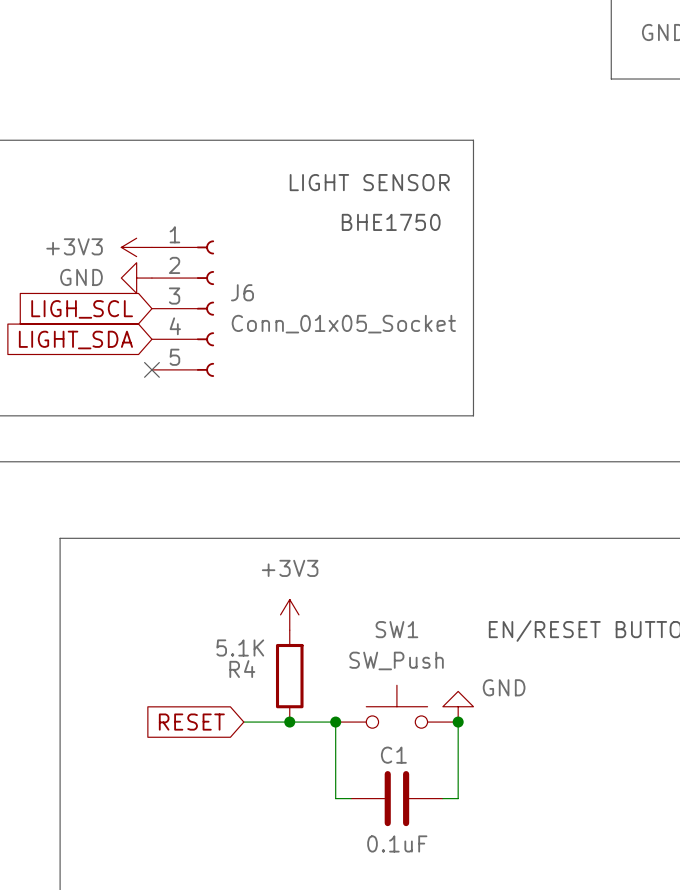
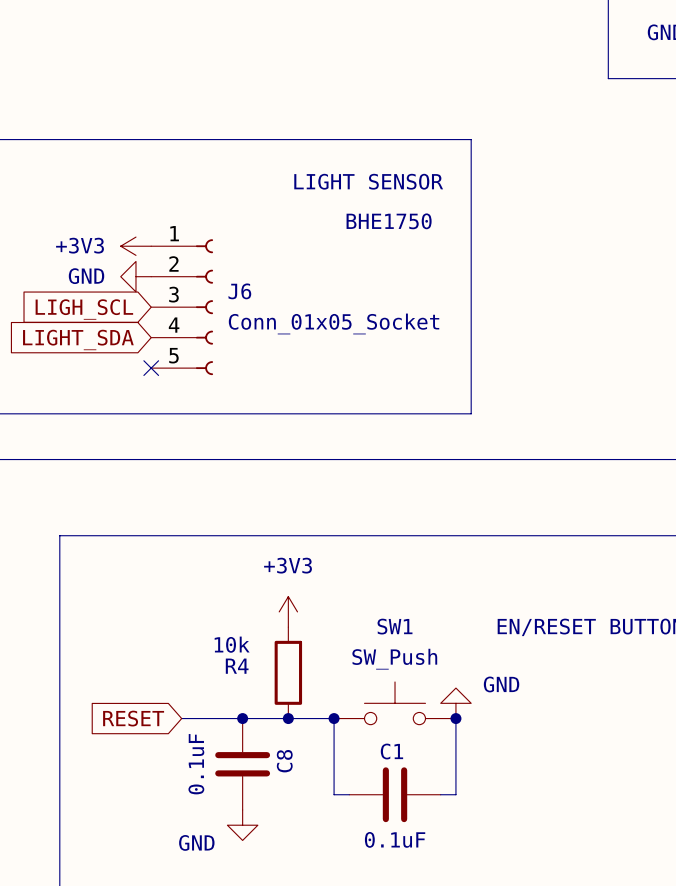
R4 value: 5.1K (240, 647) -> 10k (232, 644)
wire: none -> (181, 718) (242, 718)
global label position: RESET (191, 722) -> RESET (133, 718)
junction: none -> (242, 718)
C8: none -> 0.1uF (242, 764)
power symbol: none -> GND (242, 825)

